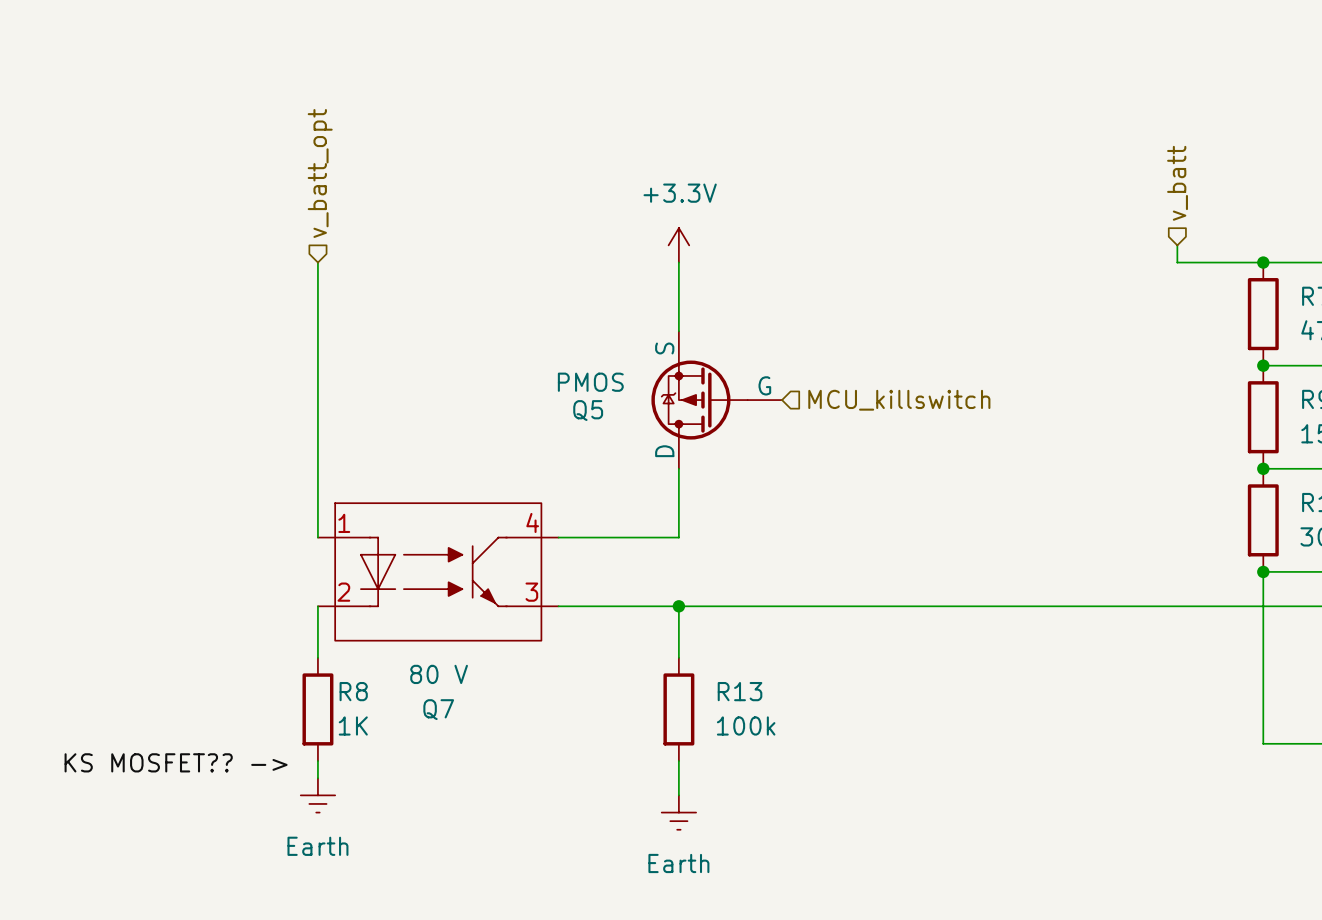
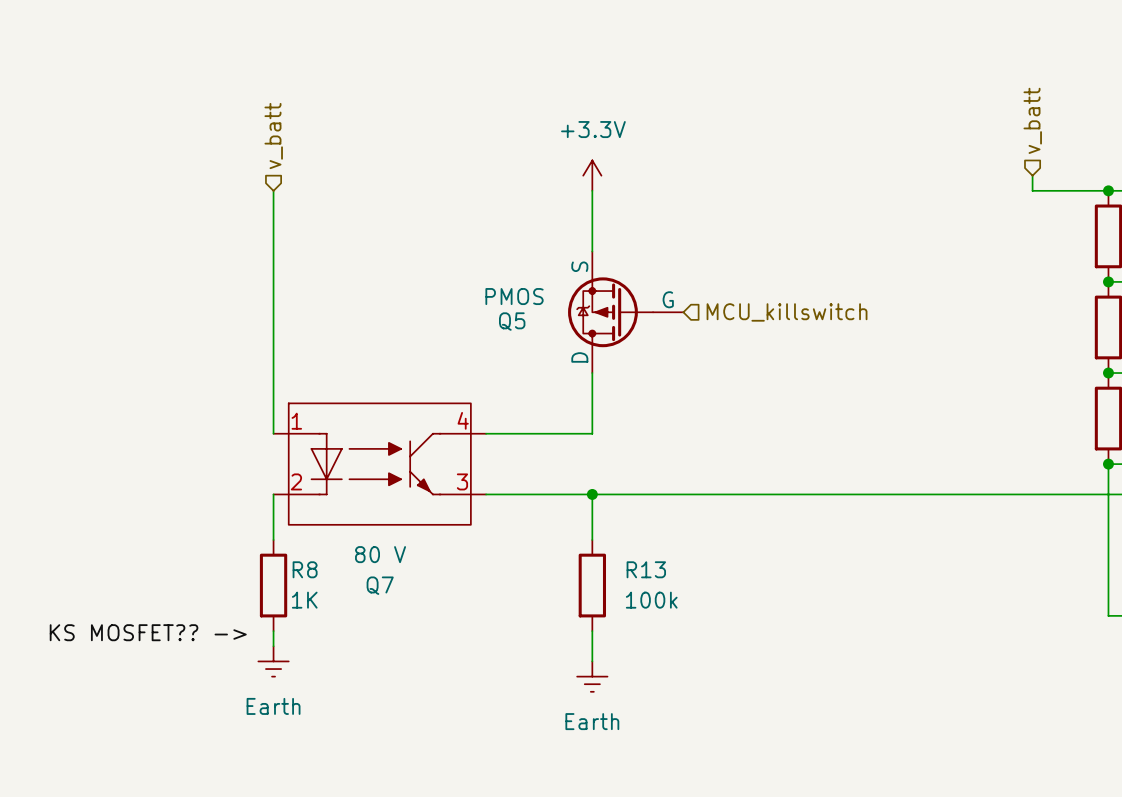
hierarchical label: v_batt_opt (320, 173) -> v_batt (273, 136)

